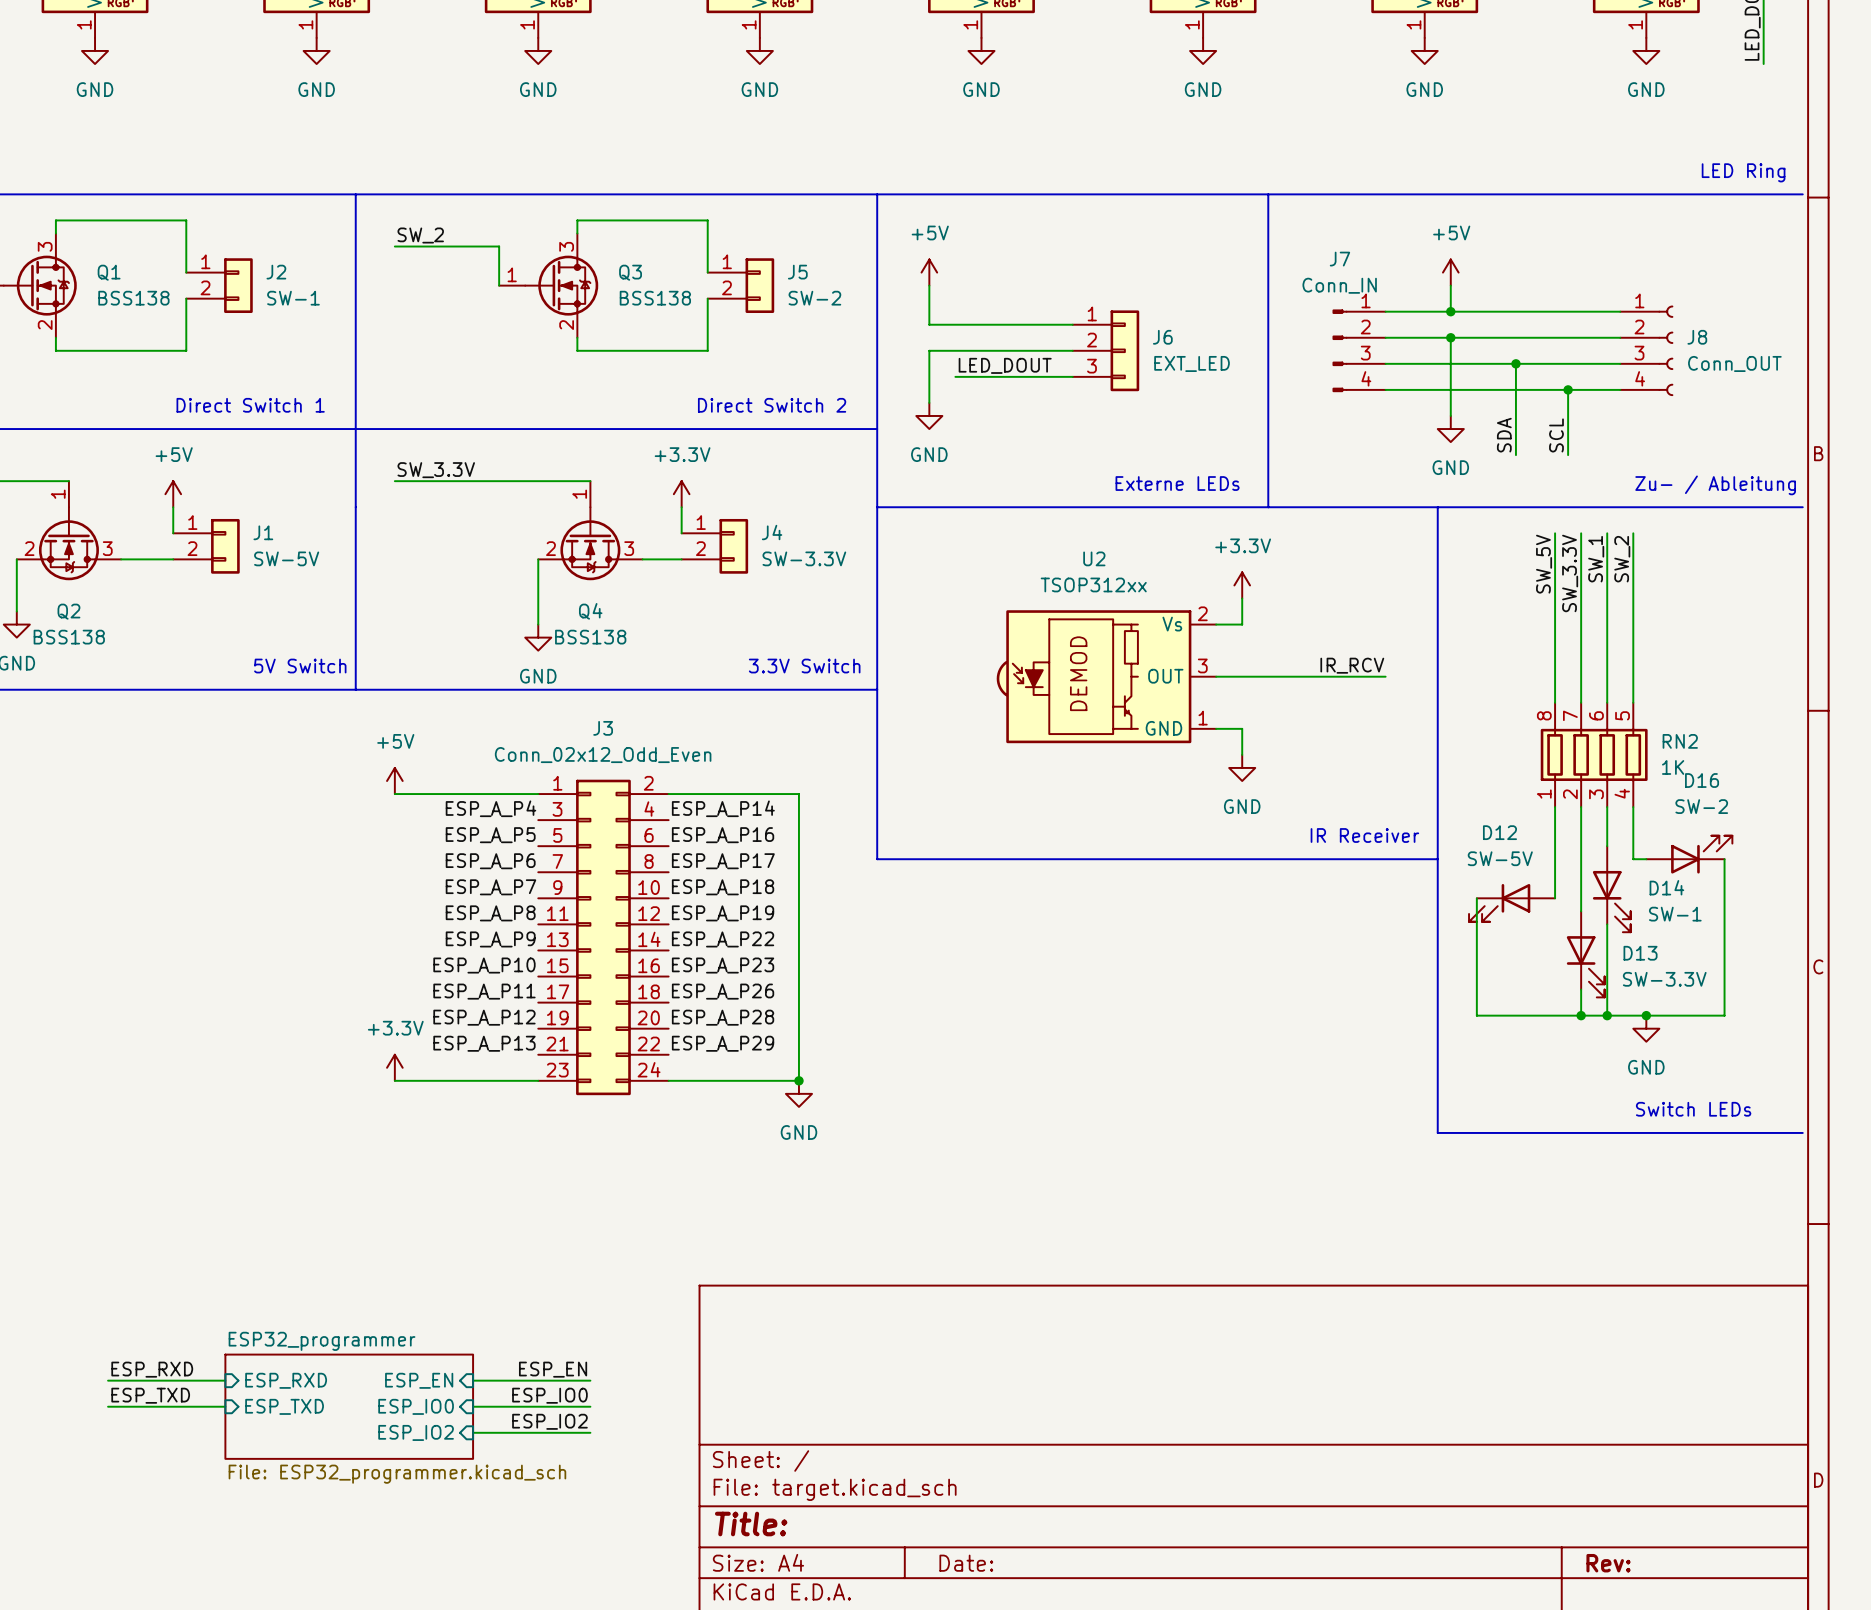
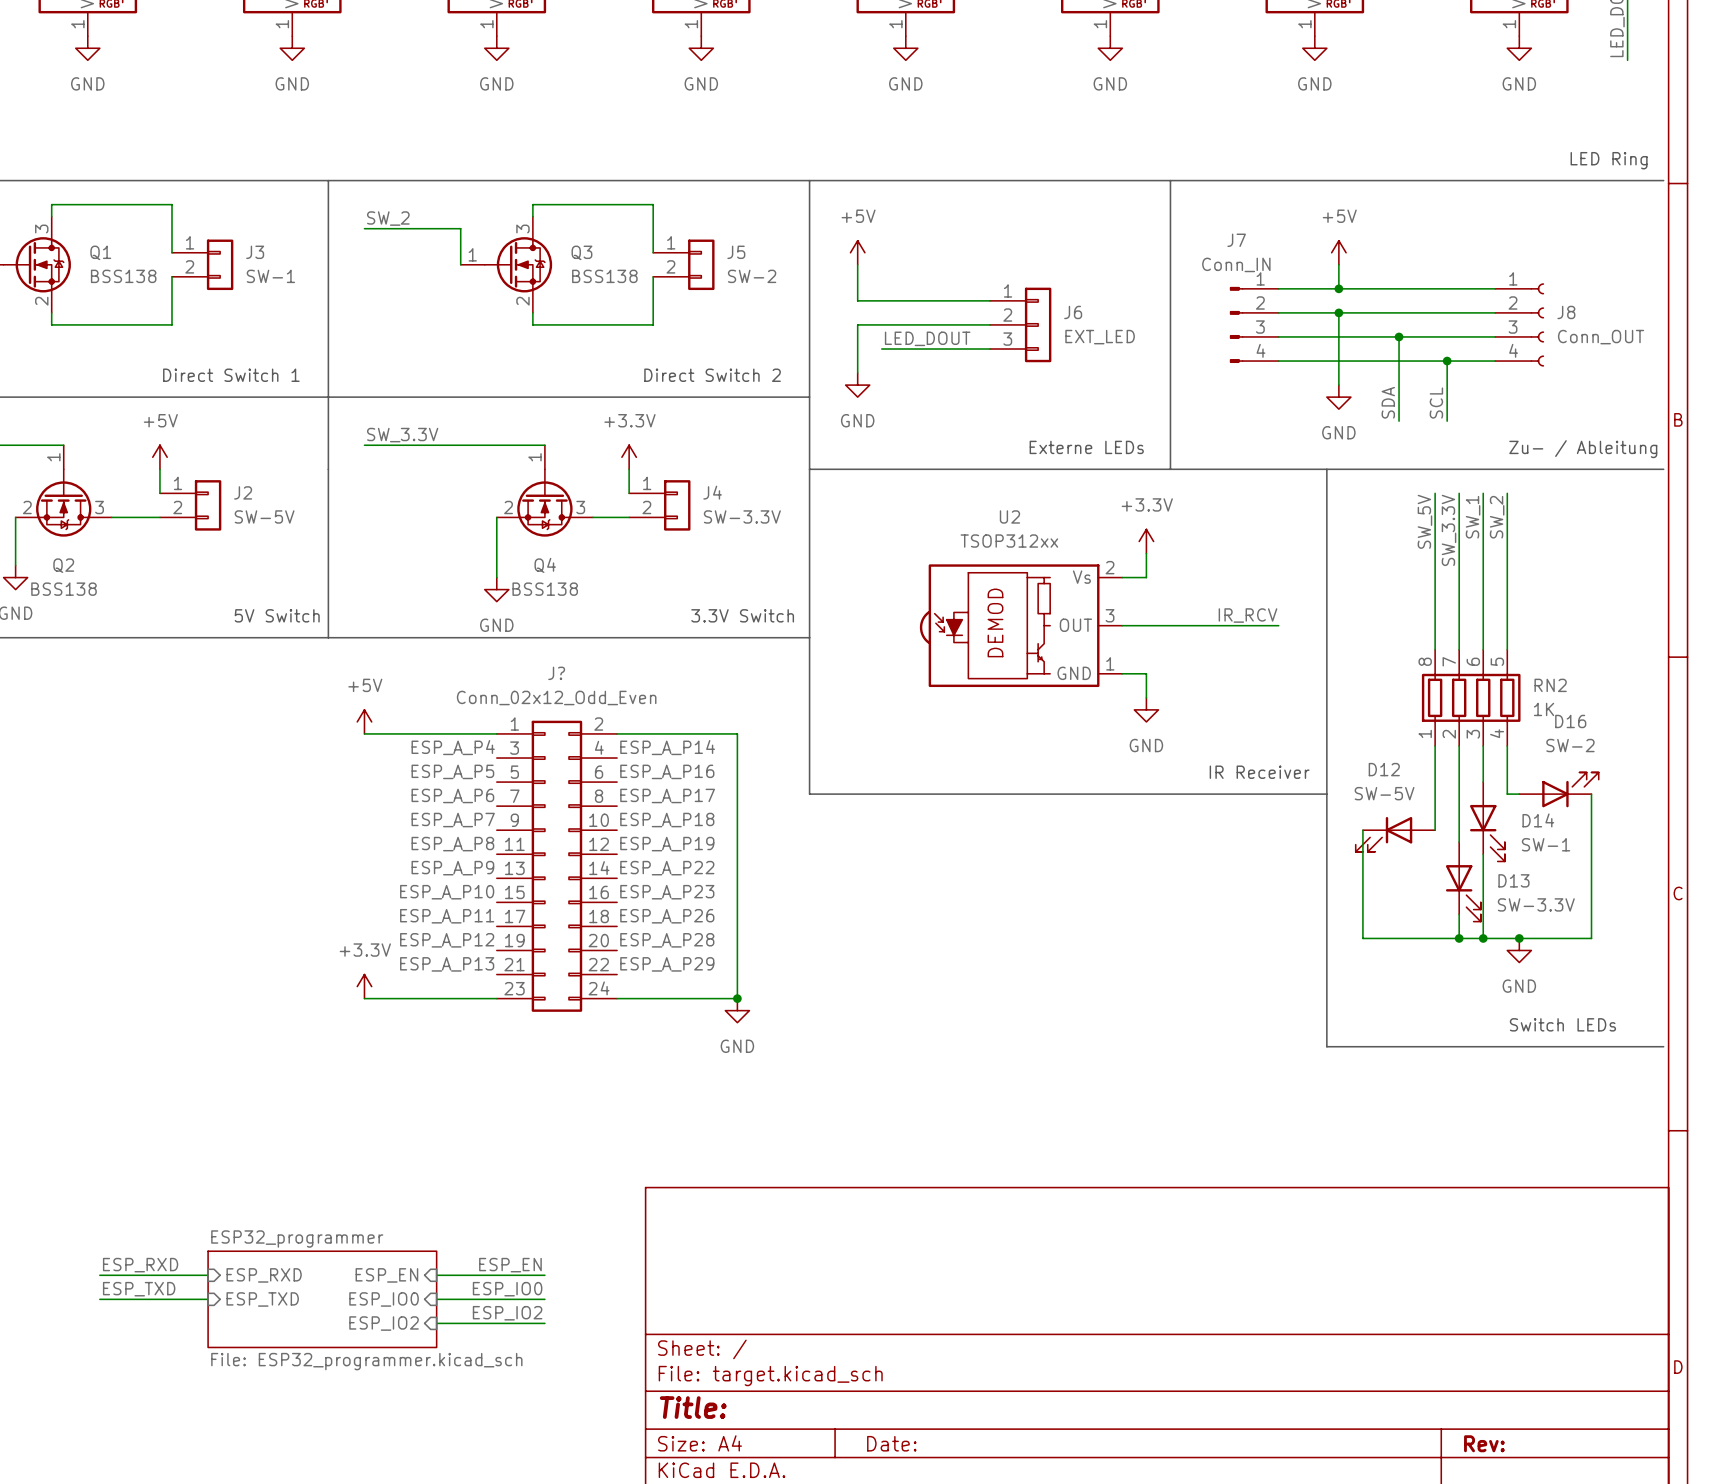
J2 name: J2 (276, 272) -> J3 (255, 252)
J1 name: J1 (263, 532) -> J2 (243, 492)
J3 name: J3 (603, 728) -> J? (556, 673)

